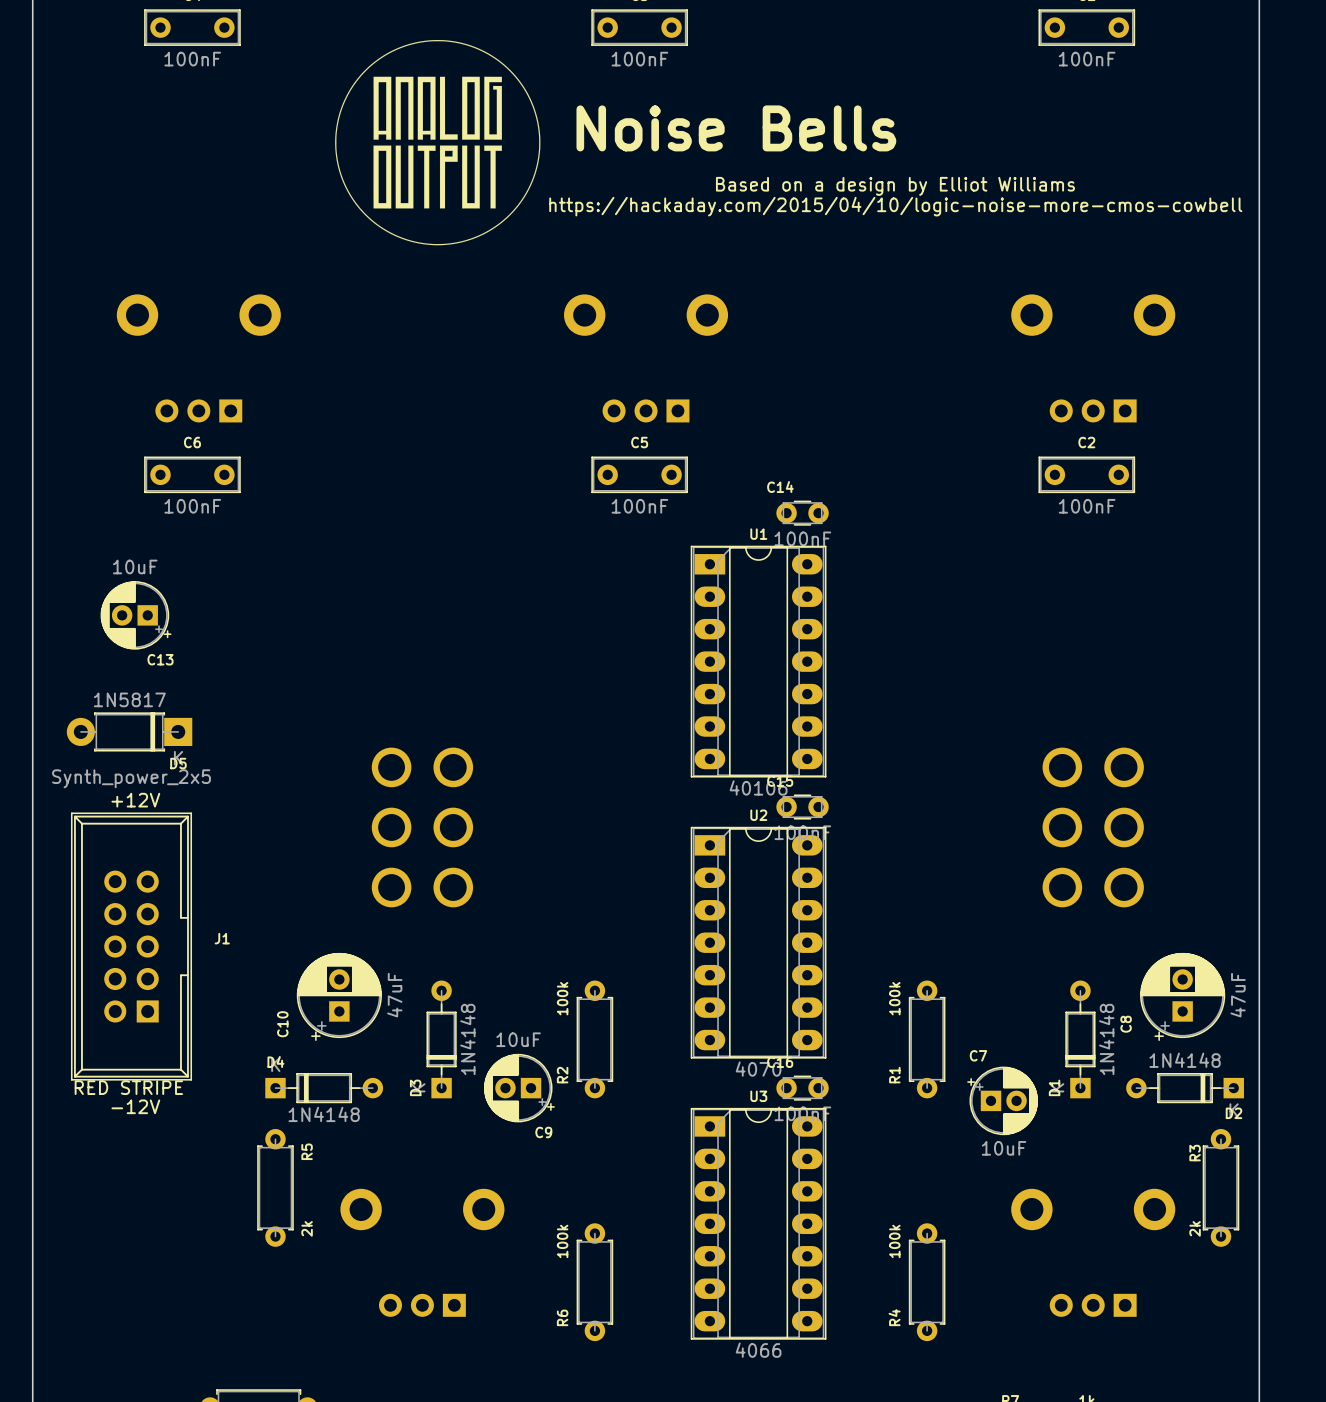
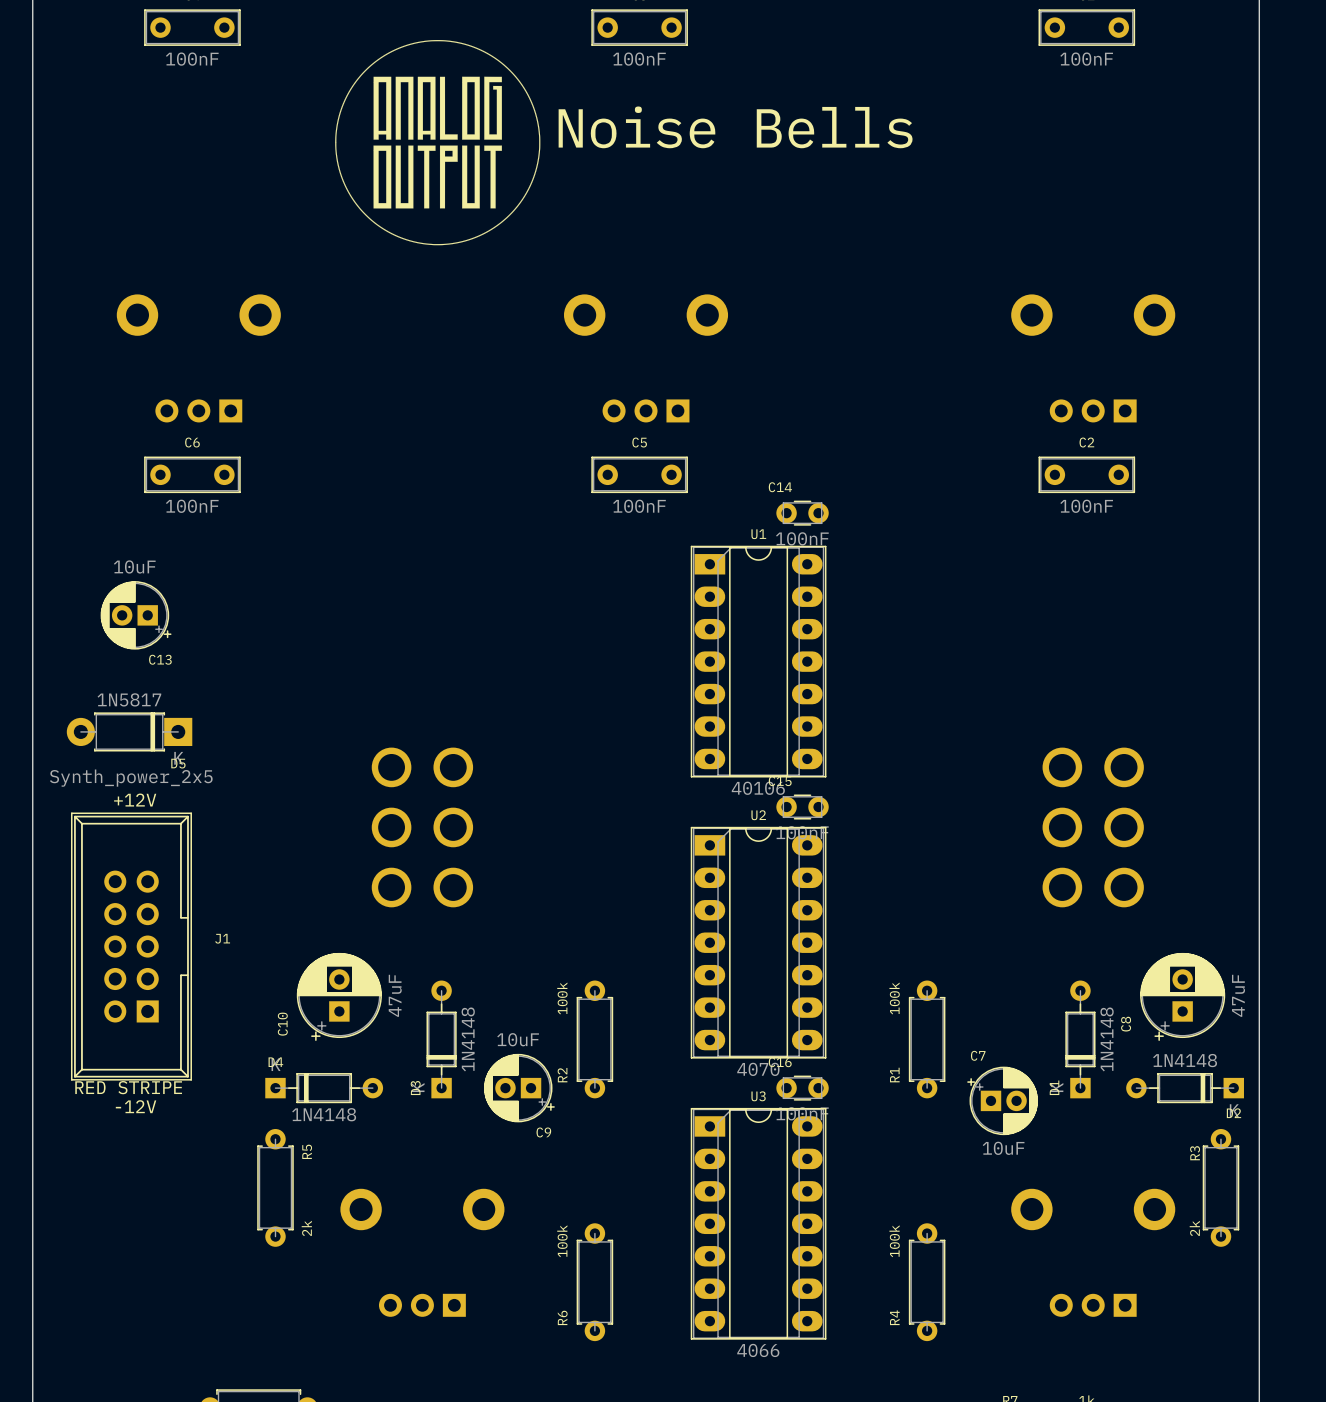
text: Based on a design by Elliot Williams (895, 186) -> none
text: https://hackaday.com/2015/04/10/logic-noise-more-cmos-cowbell (895, 206) -> none

